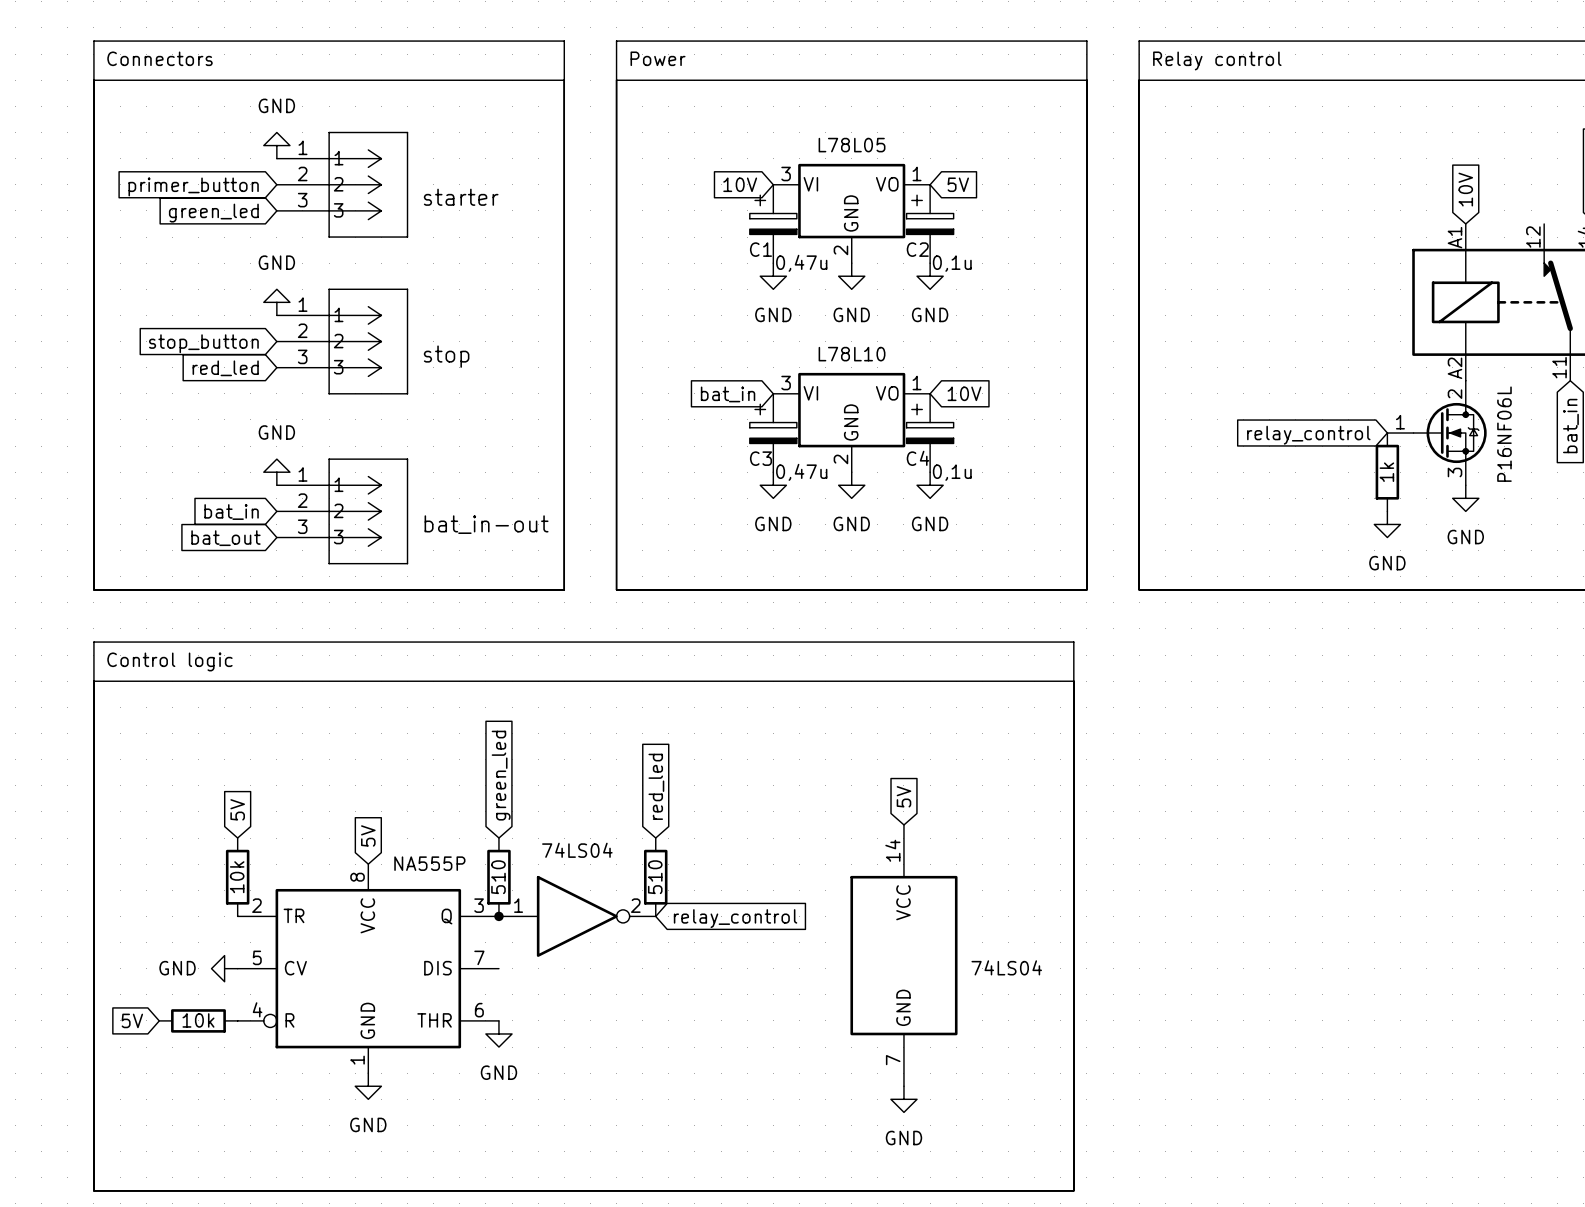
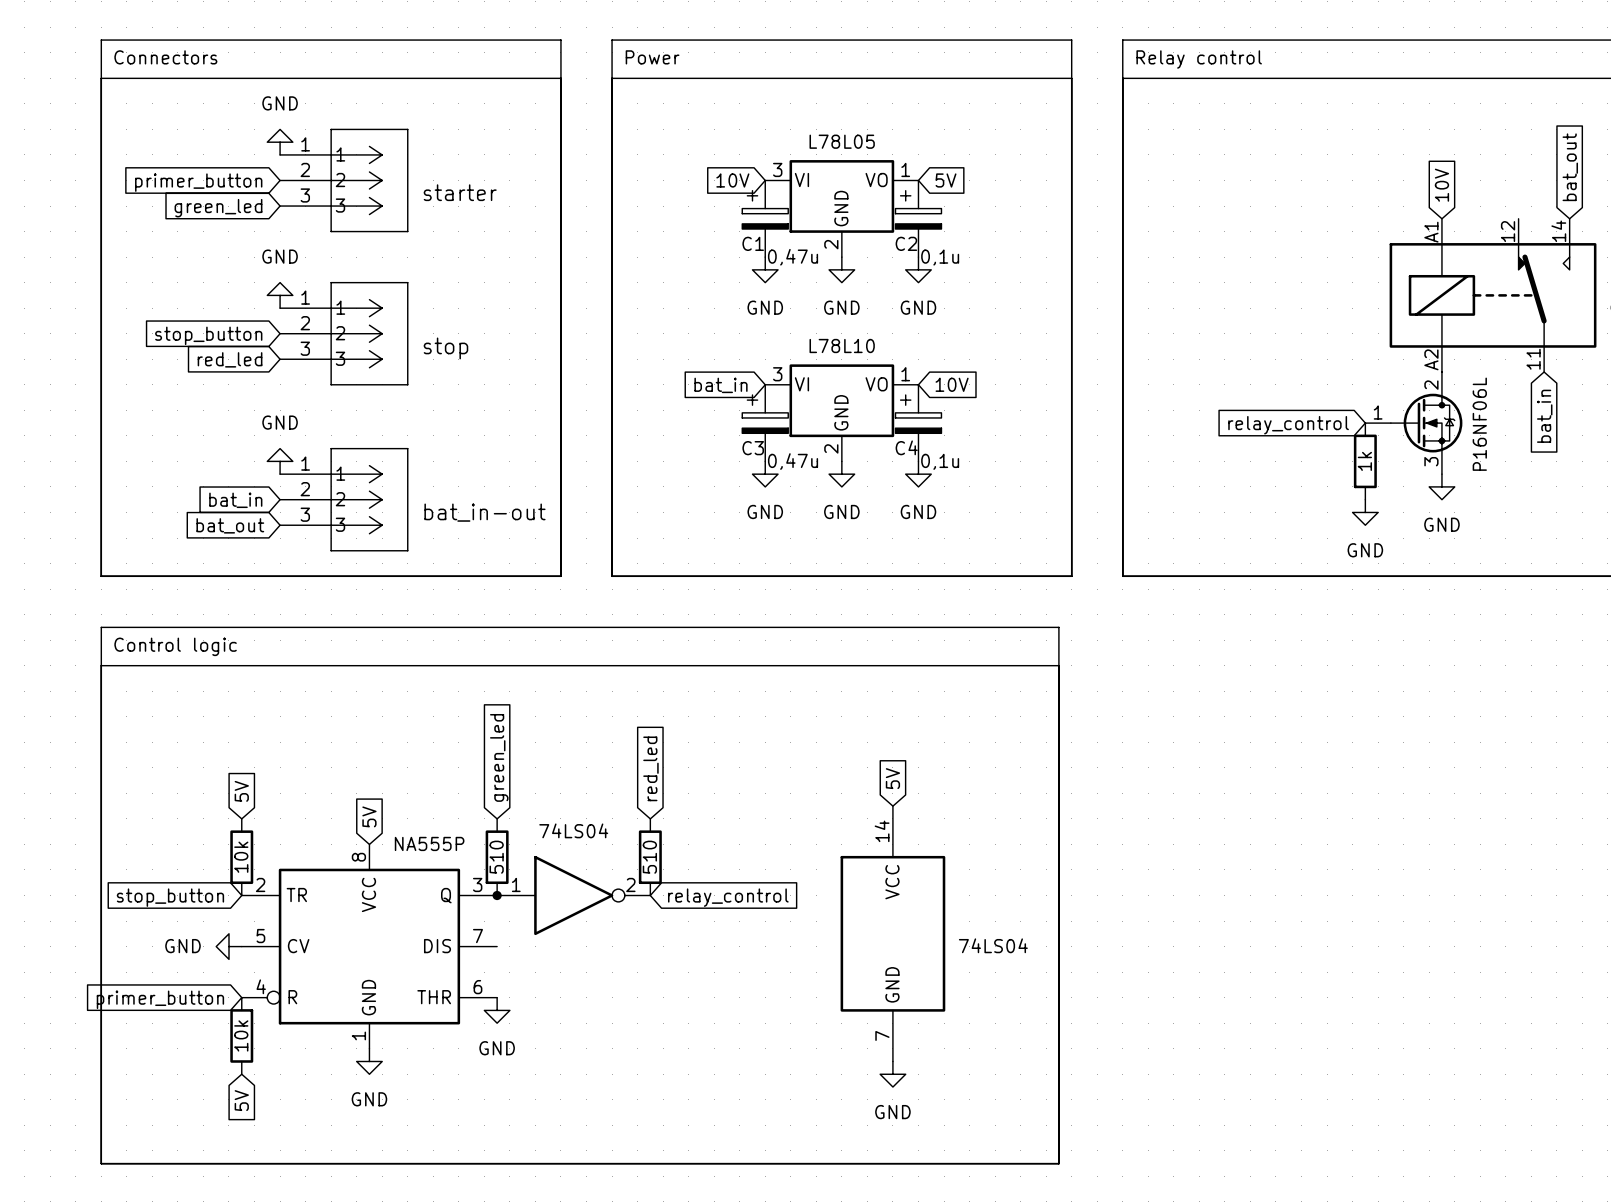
global label: none -> stop_button (170, 897)
global label rotation: 0° (132, 1020) -> 90° counterclockwise (241, 1100)
global label position: 5V (132, 1020) -> 5V (241, 1100)
part rotation: 0° (198, 1020) -> 90° clockwise (241, 1035)
part position: (198, 1020) -> (241, 1035)
global label: none -> primer_button (160, 999)

